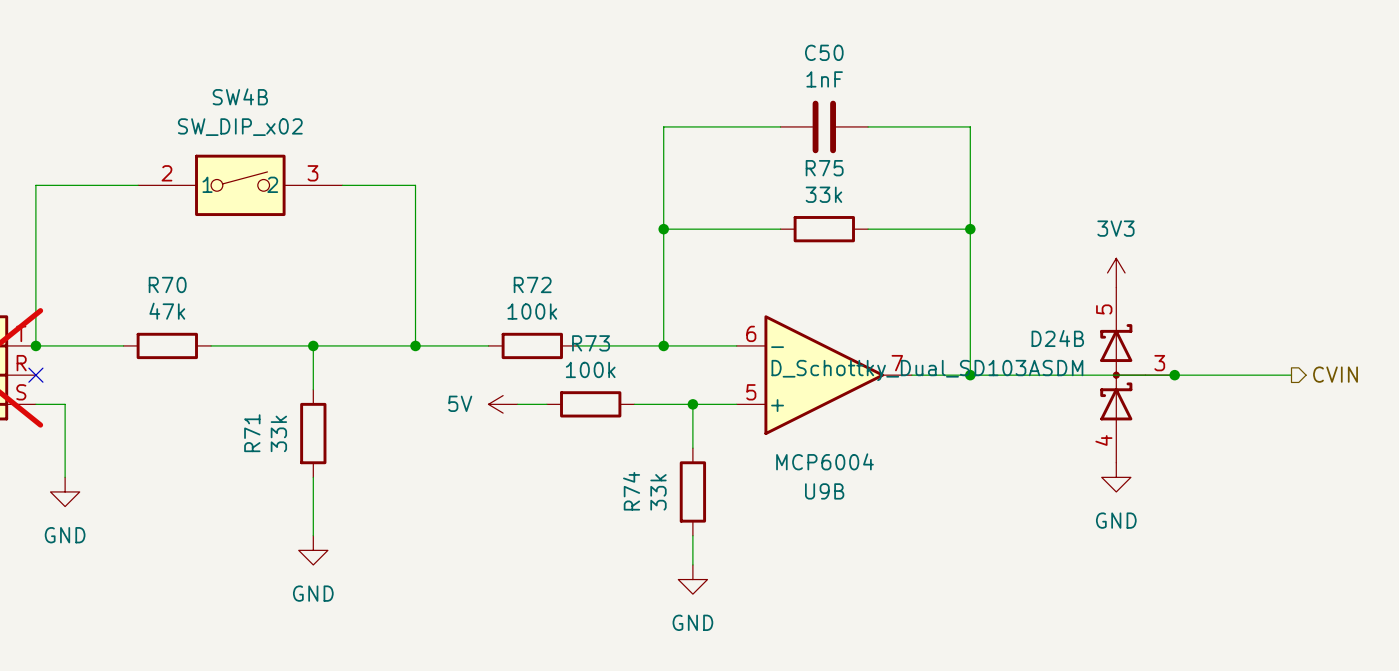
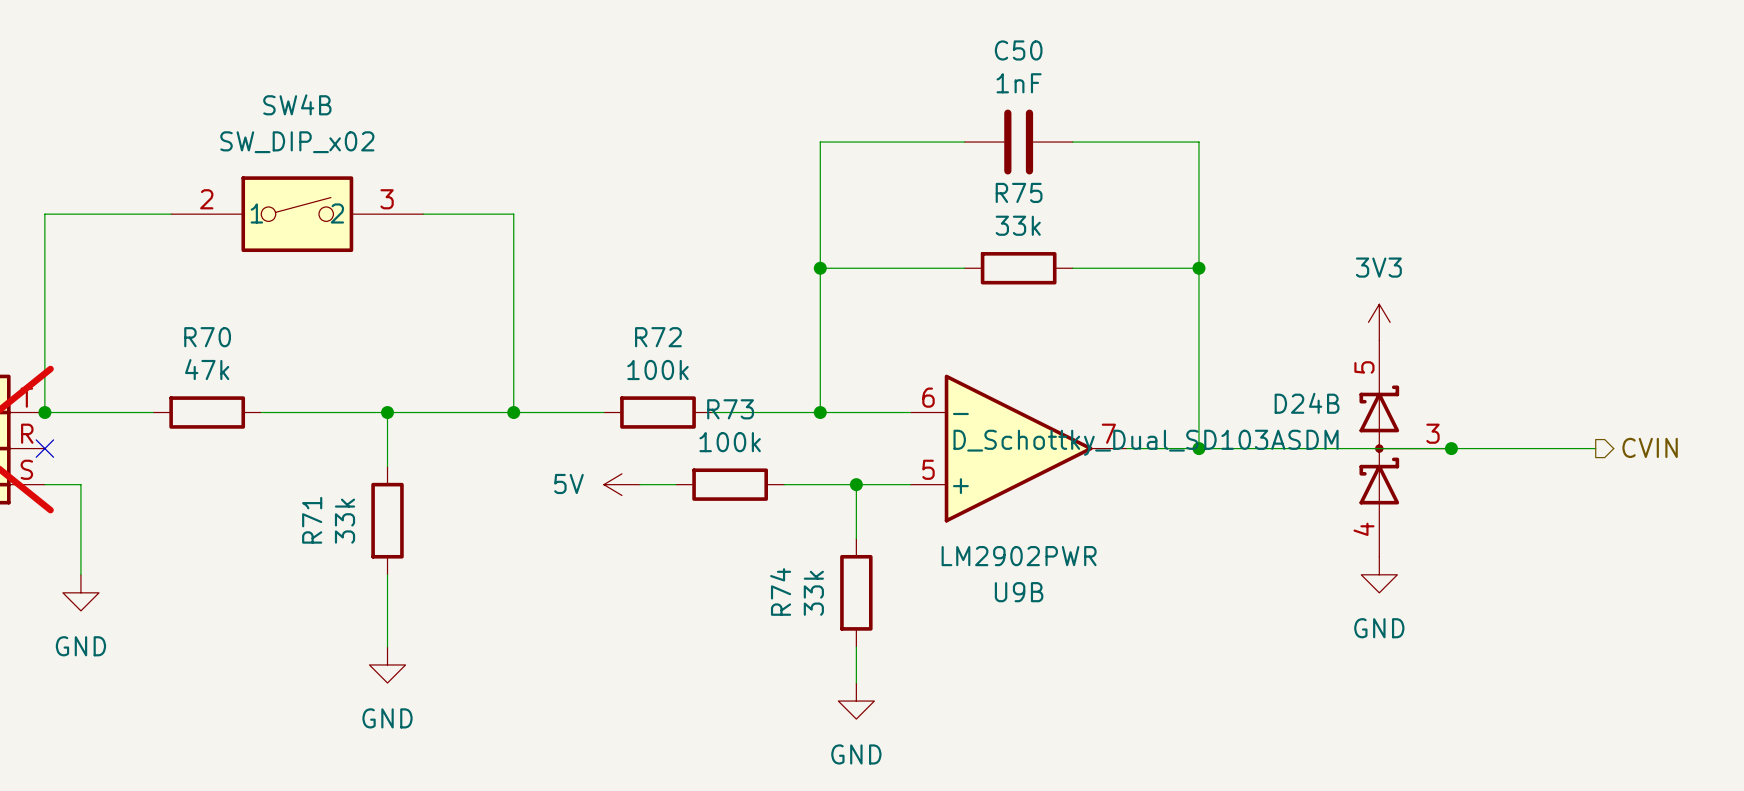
U9B value: MCP6004 (825, 461) -> LM2902PWR (1019, 556)

